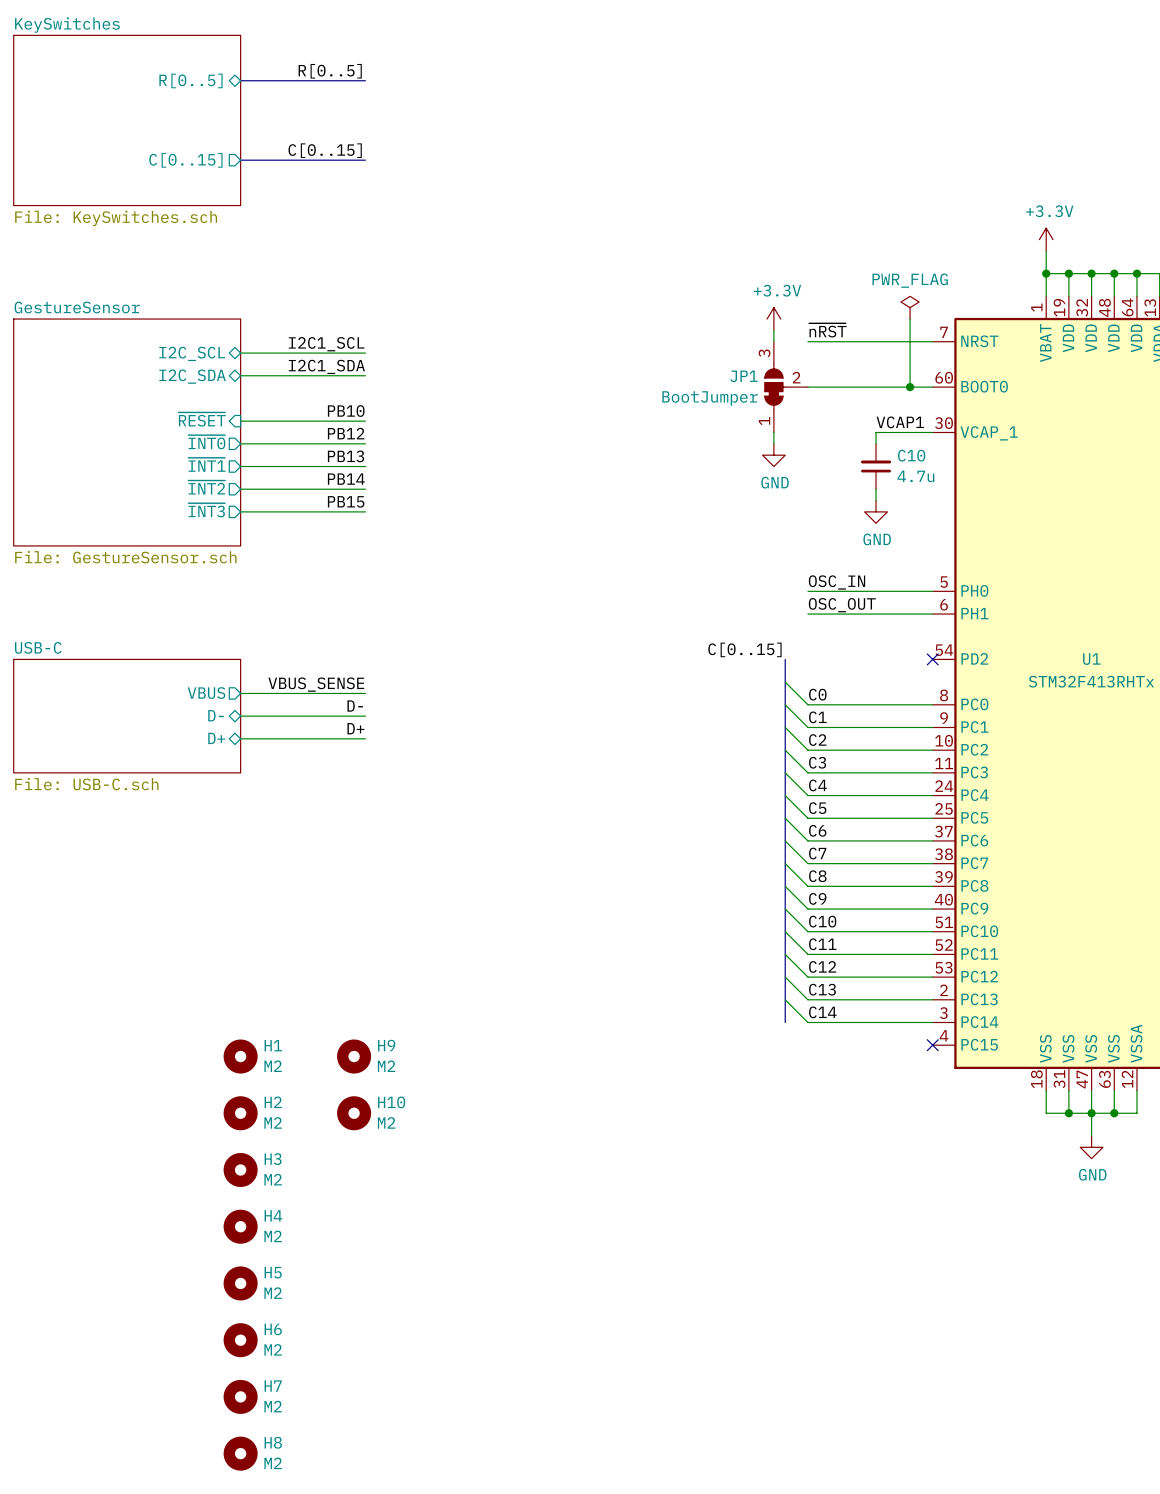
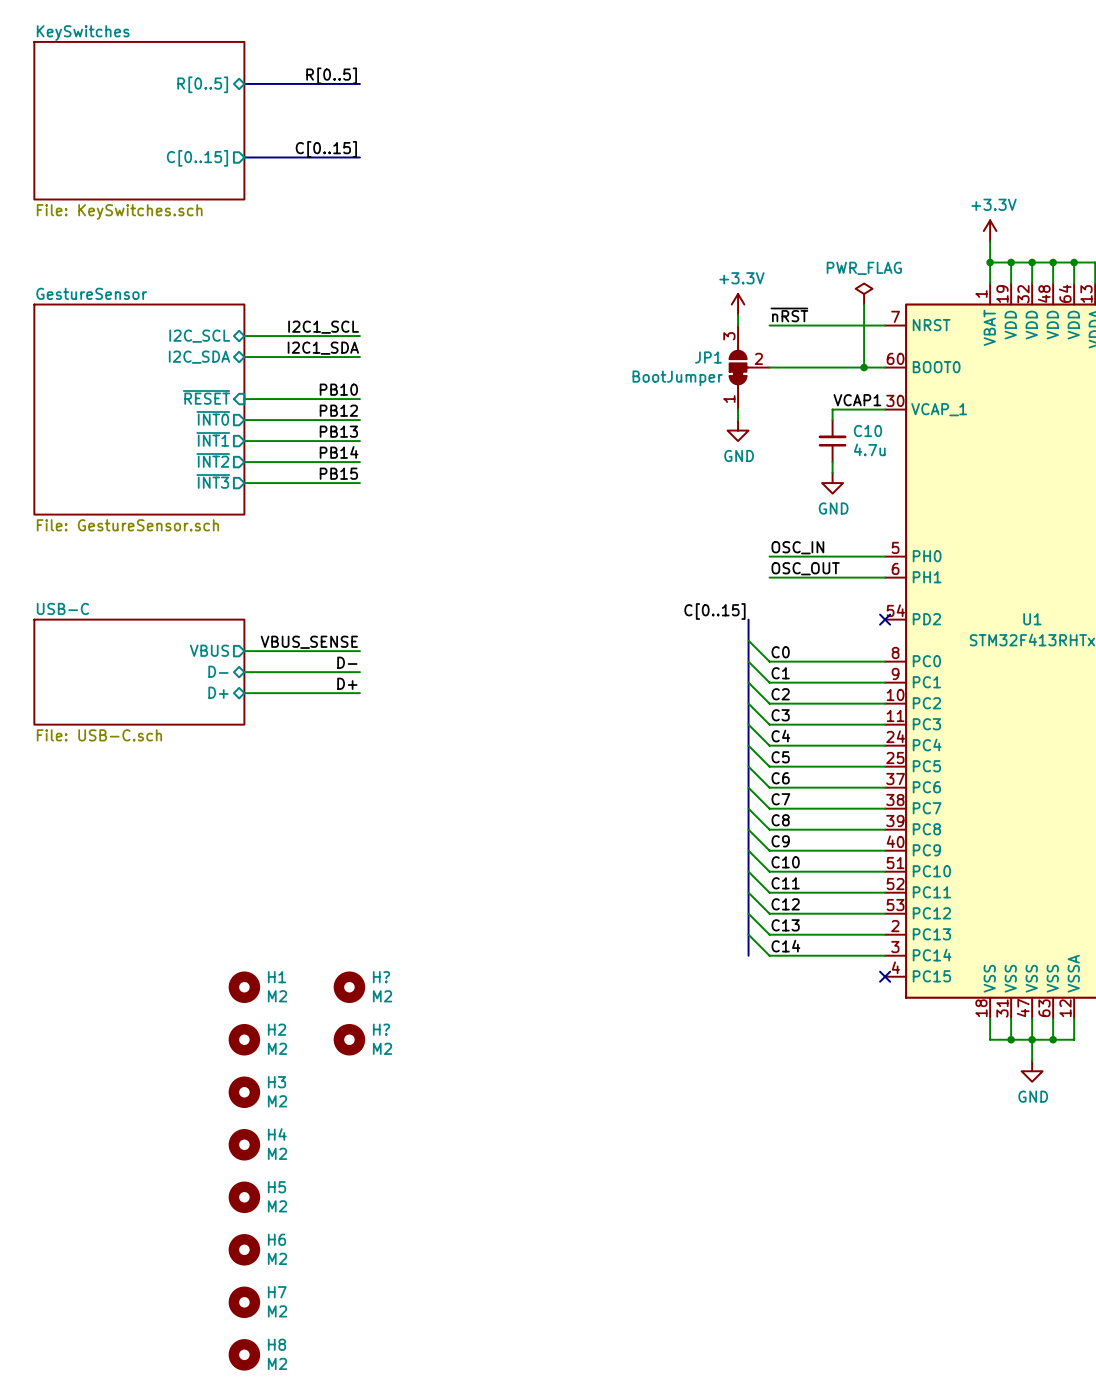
H9 name: H9 (386, 1045) -> H? (381, 977)
H10 name: H10 (391, 1102) -> H? (381, 1029)

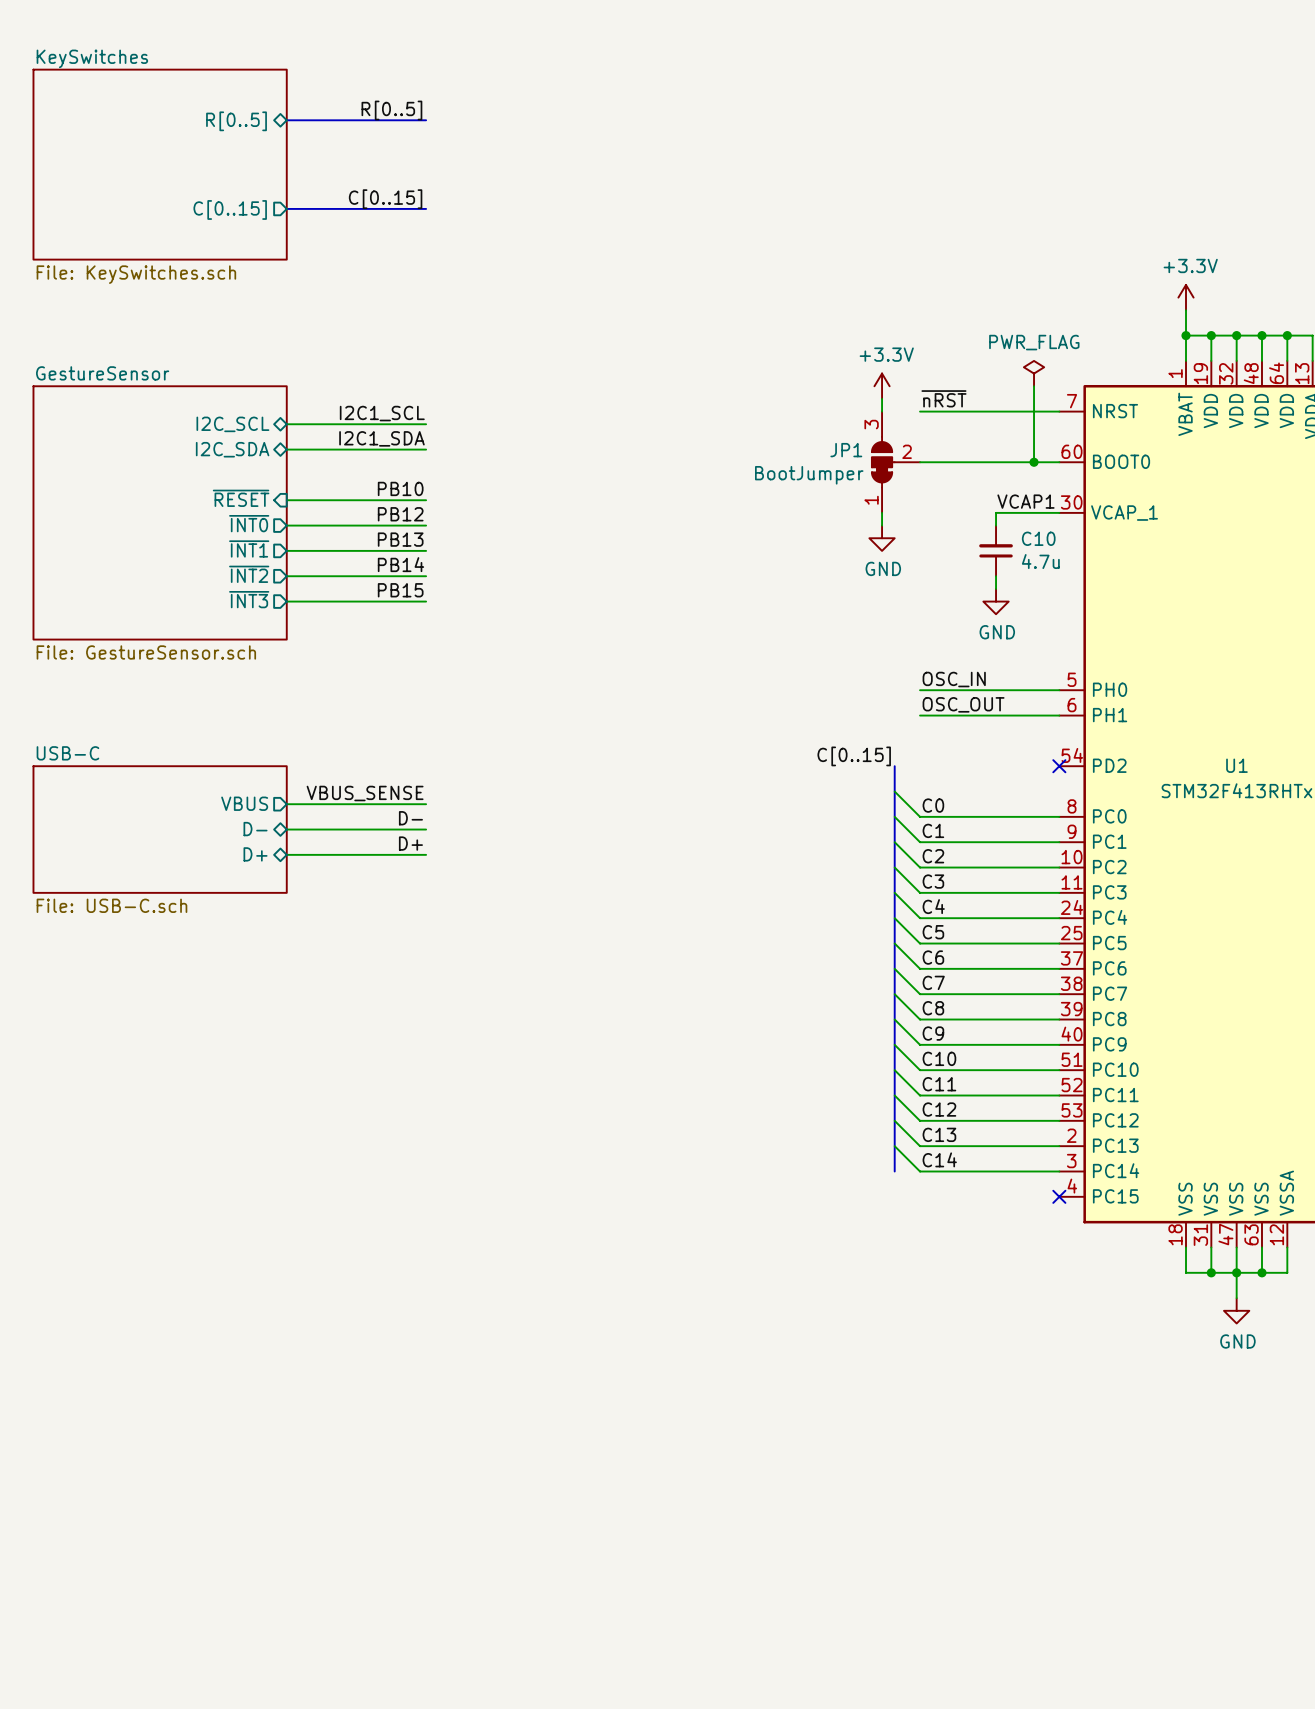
H1: M2 (244, 987) -> none
H?: M2 (349, 987) -> none
H2: M2 (244, 1039) -> none
H?: M2 (349, 1039) -> none
H3: M2 (244, 1092) -> none
H4: M2 (244, 1144) -> none
H5: M2 (244, 1197) -> none
H6: M2 (244, 1249) -> none
H7: M2 (244, 1302) -> none
H8: M2 (244, 1354) -> none

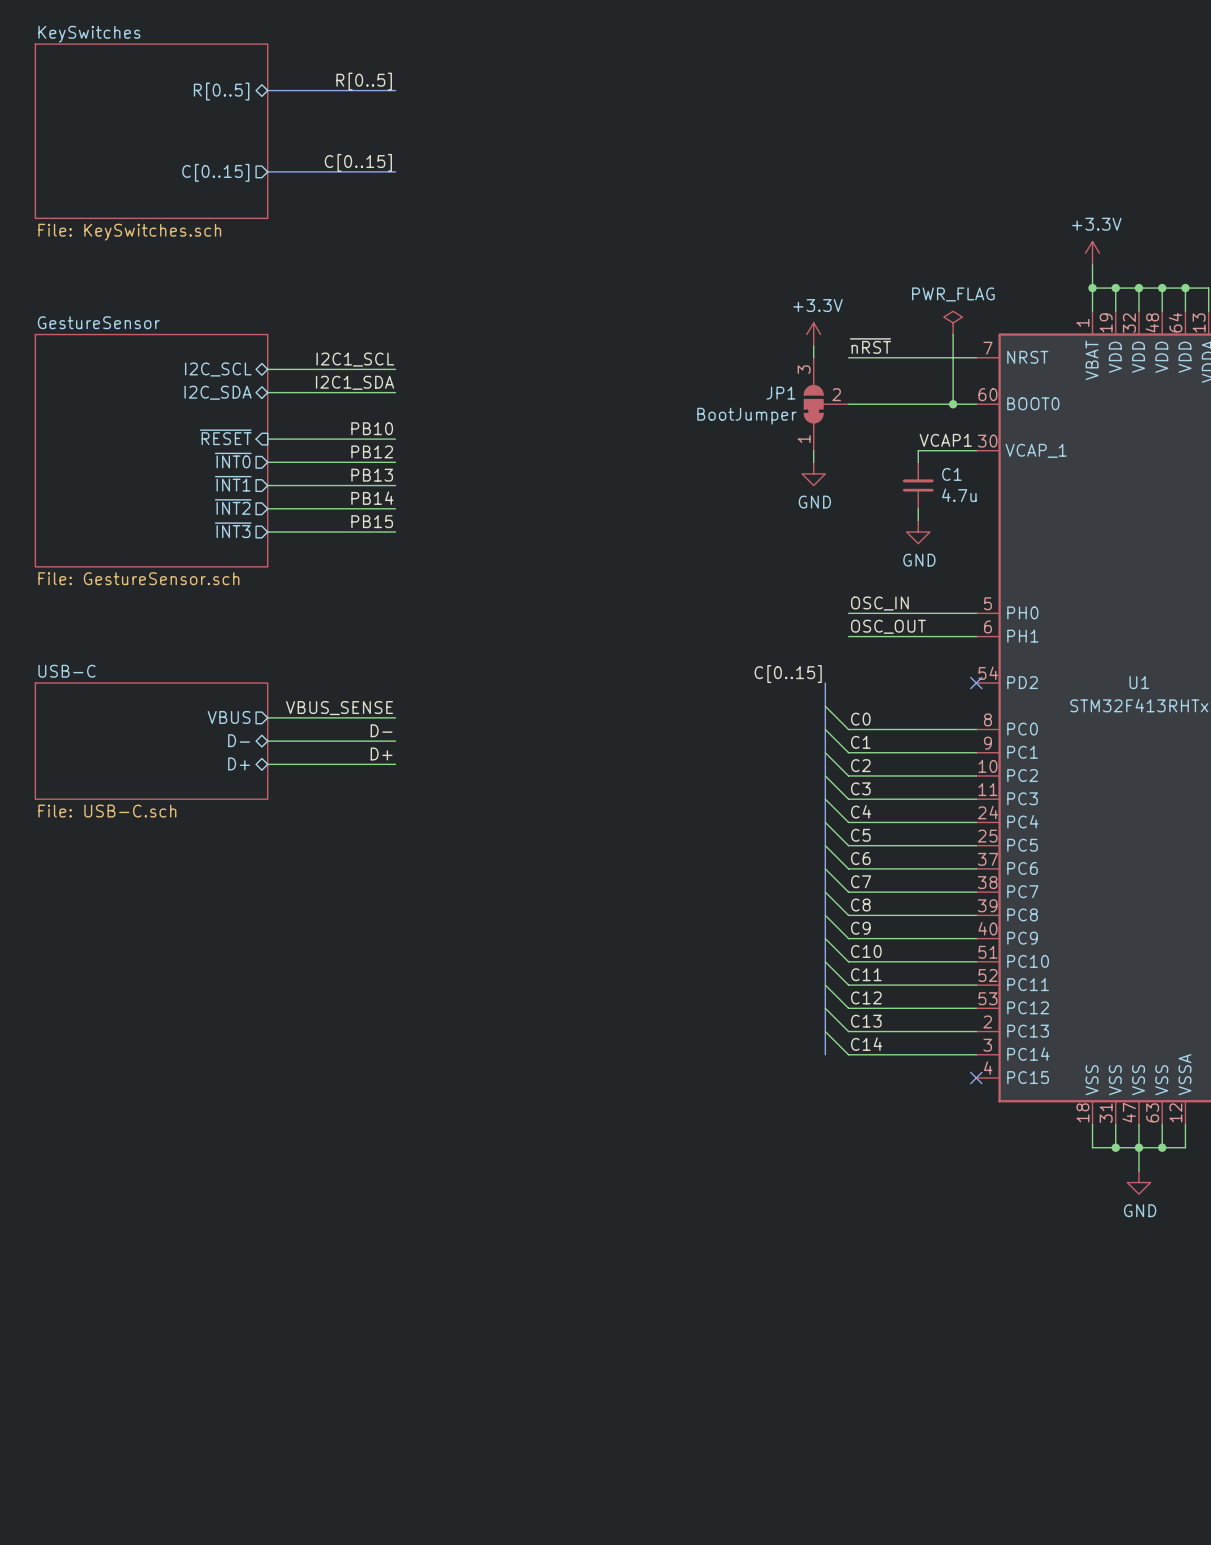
C10 name: C10 (1038, 538) -> C1 (951, 474)

